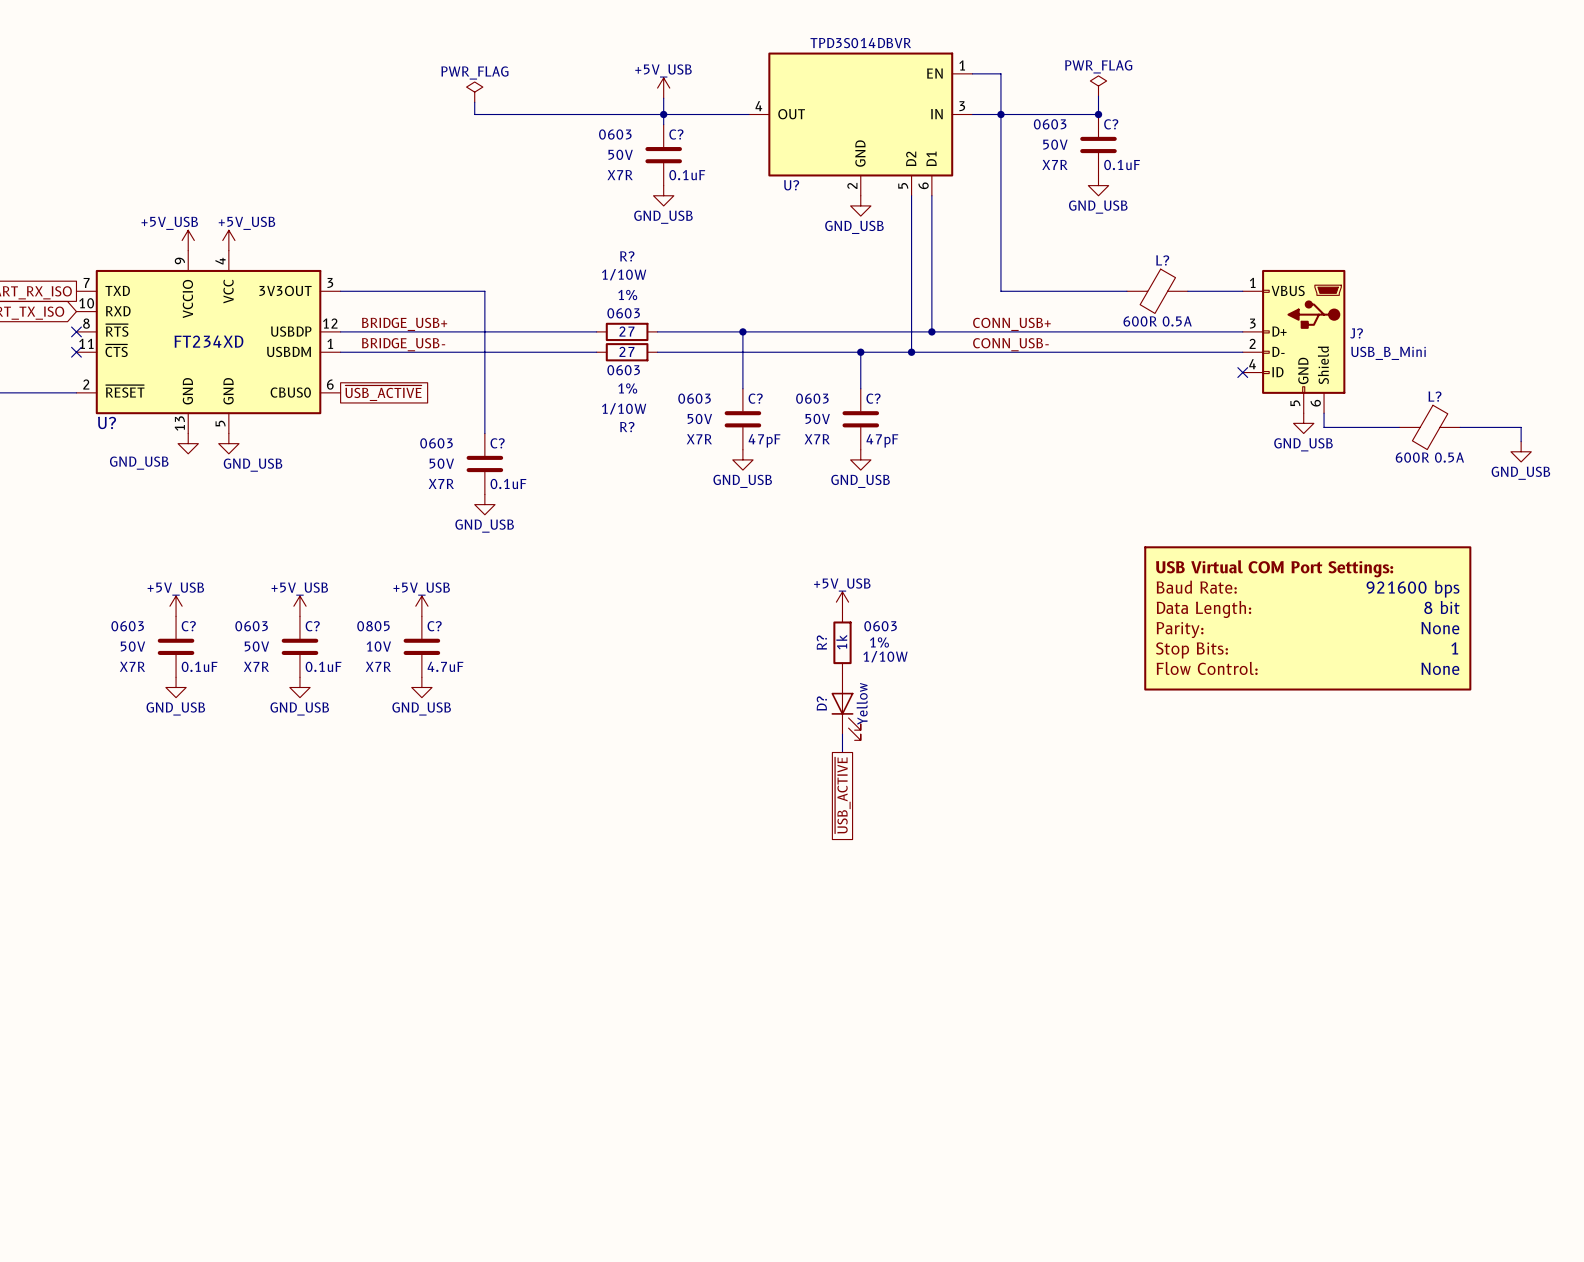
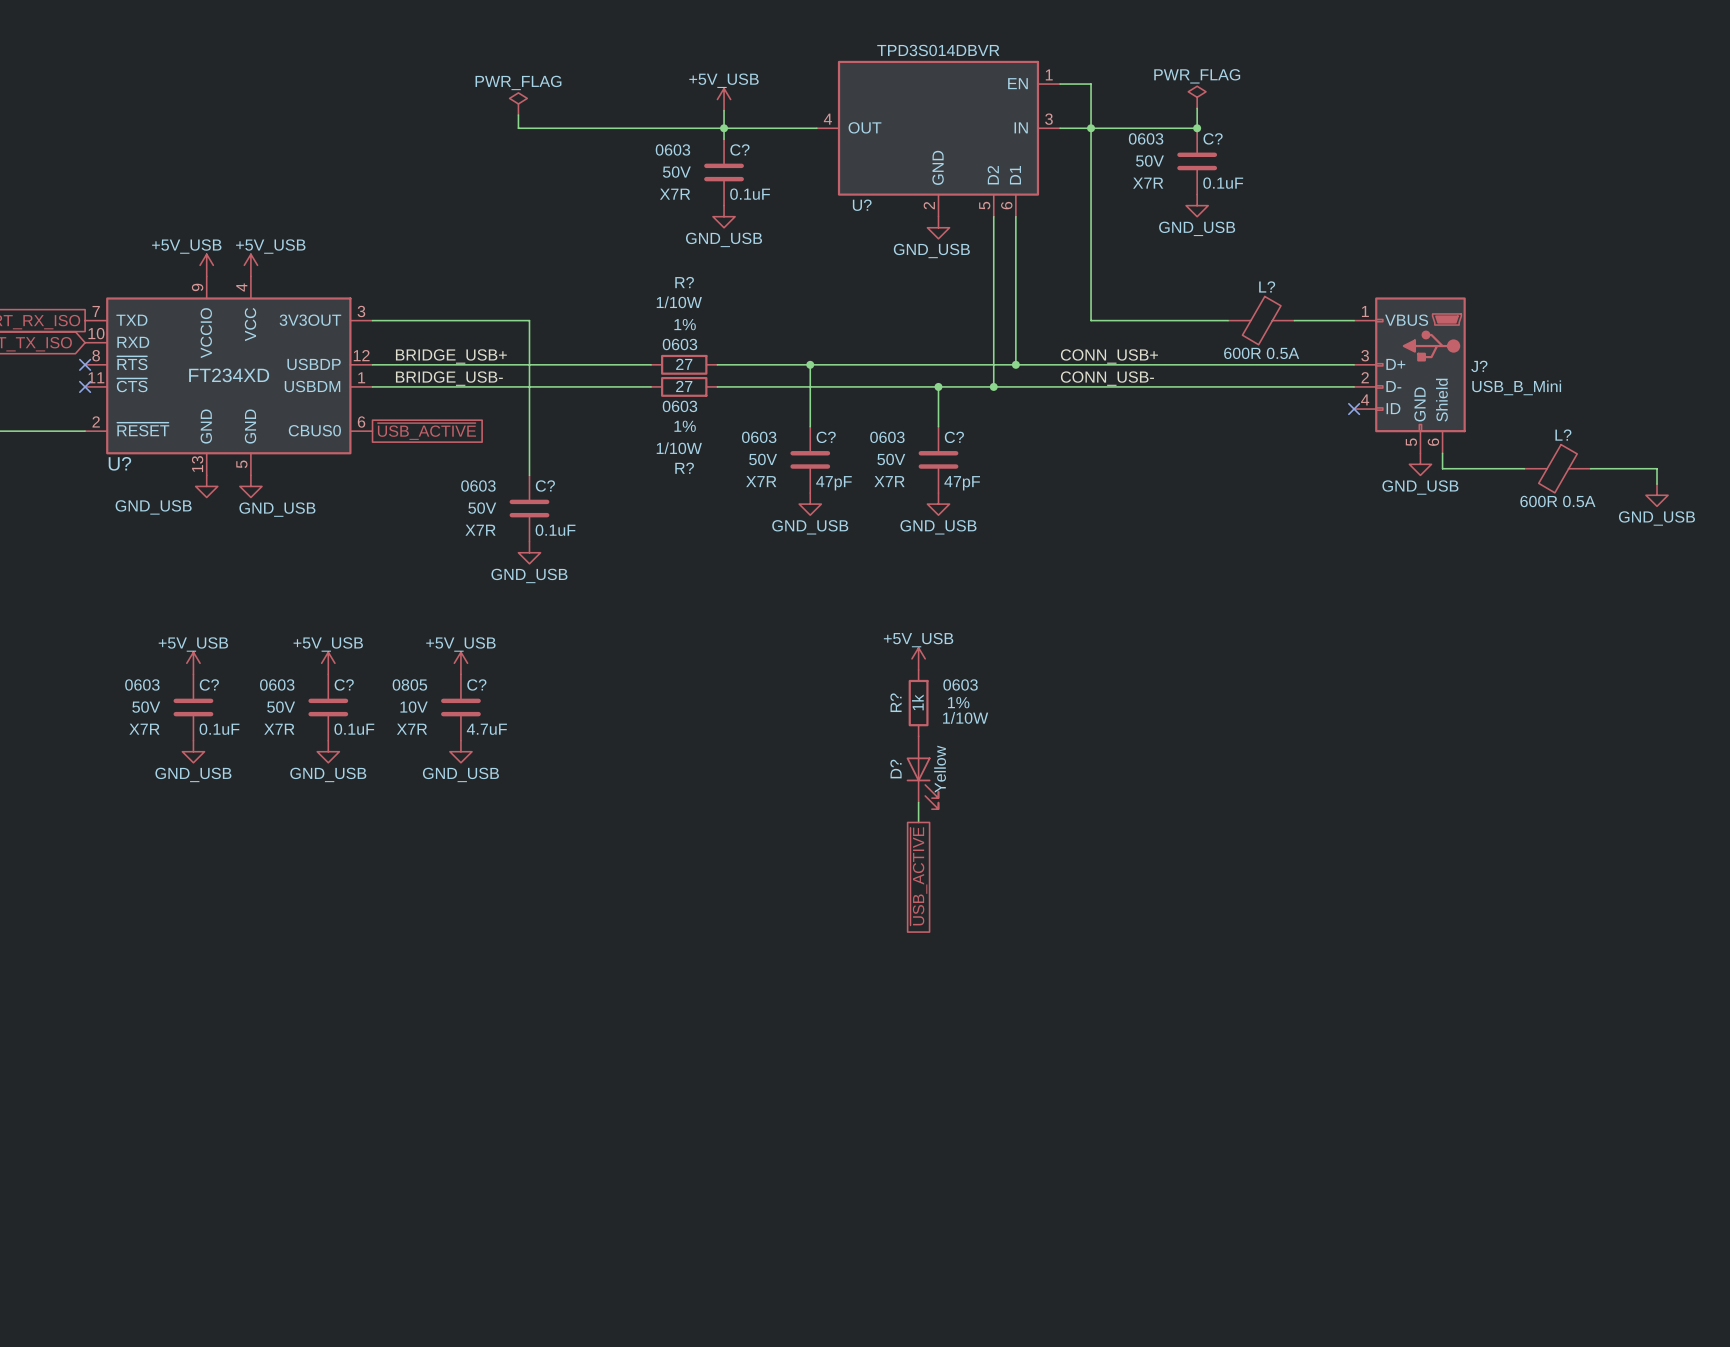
part: (1307, 618) -> none

